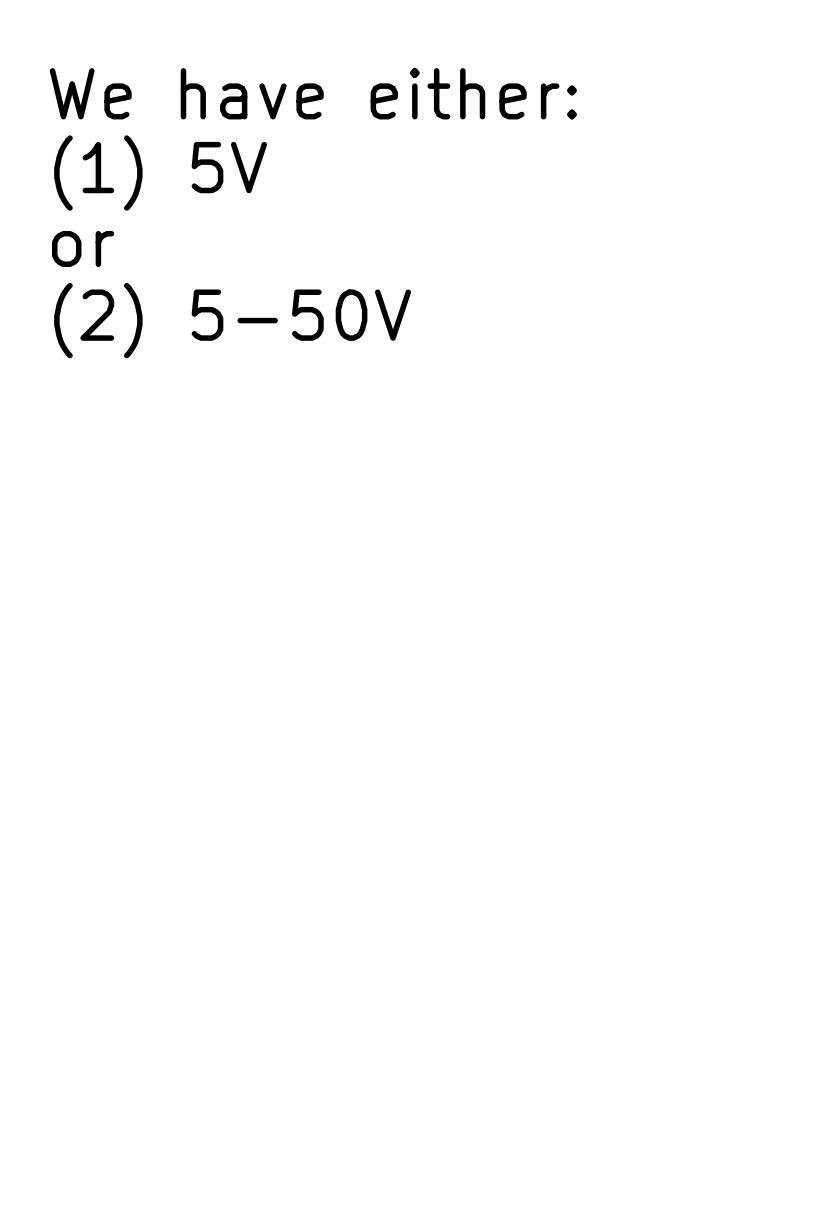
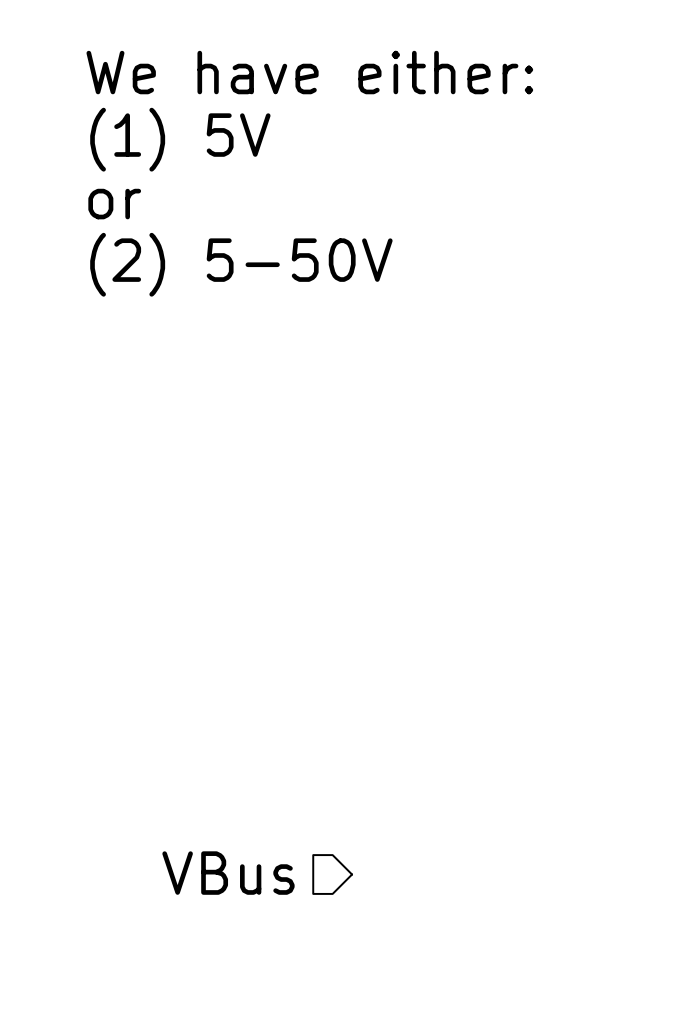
hierarchical label: none -> VBus (228, 873)

